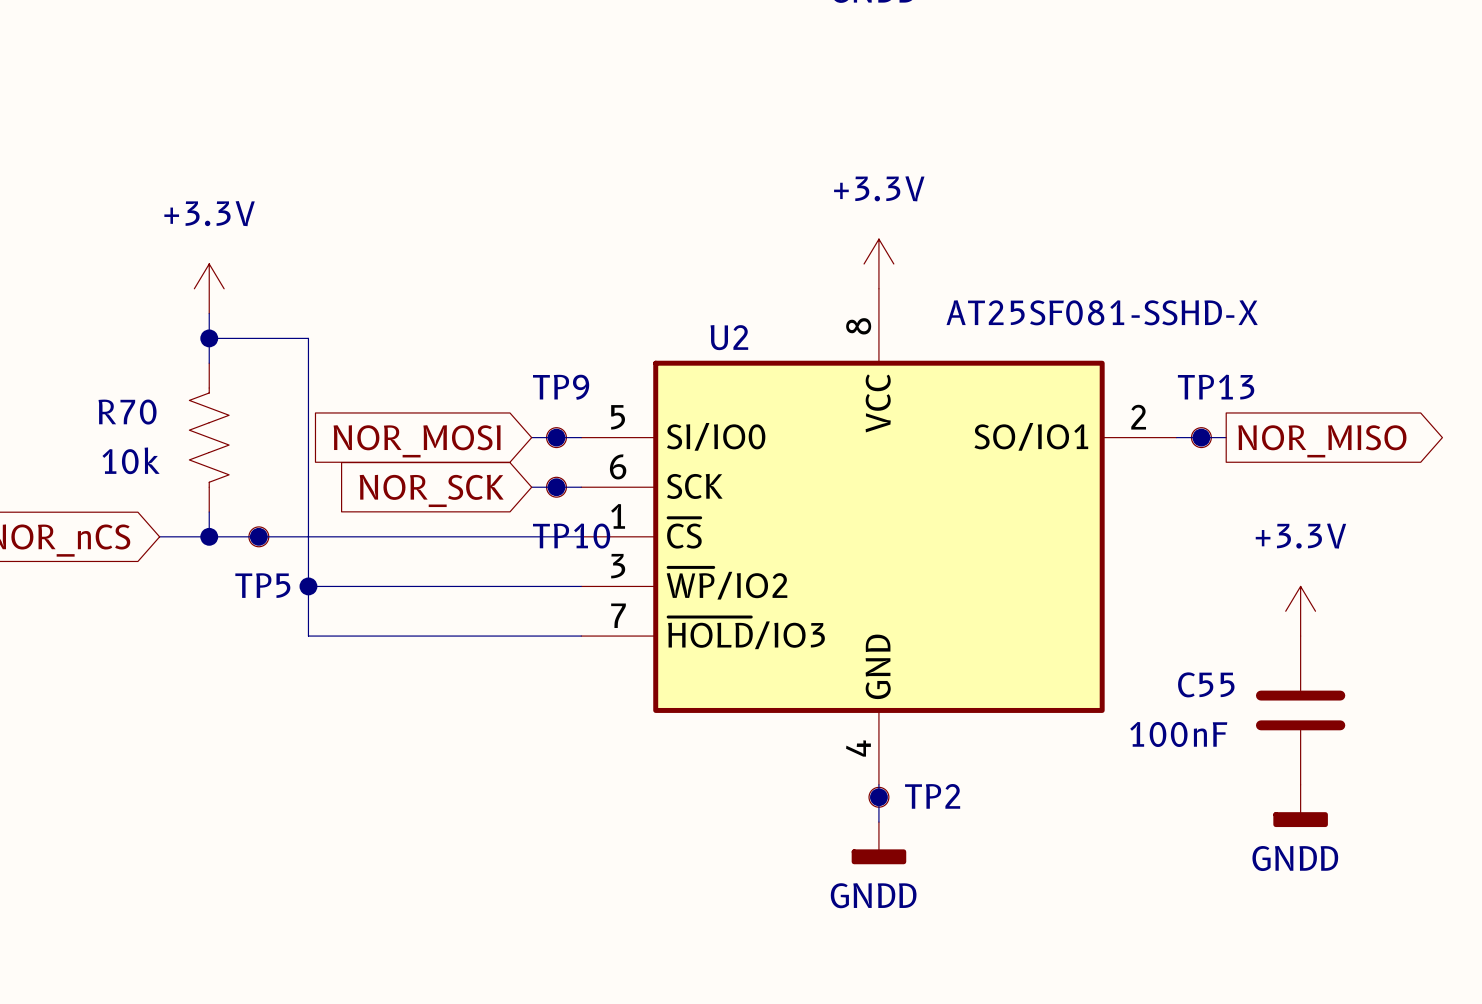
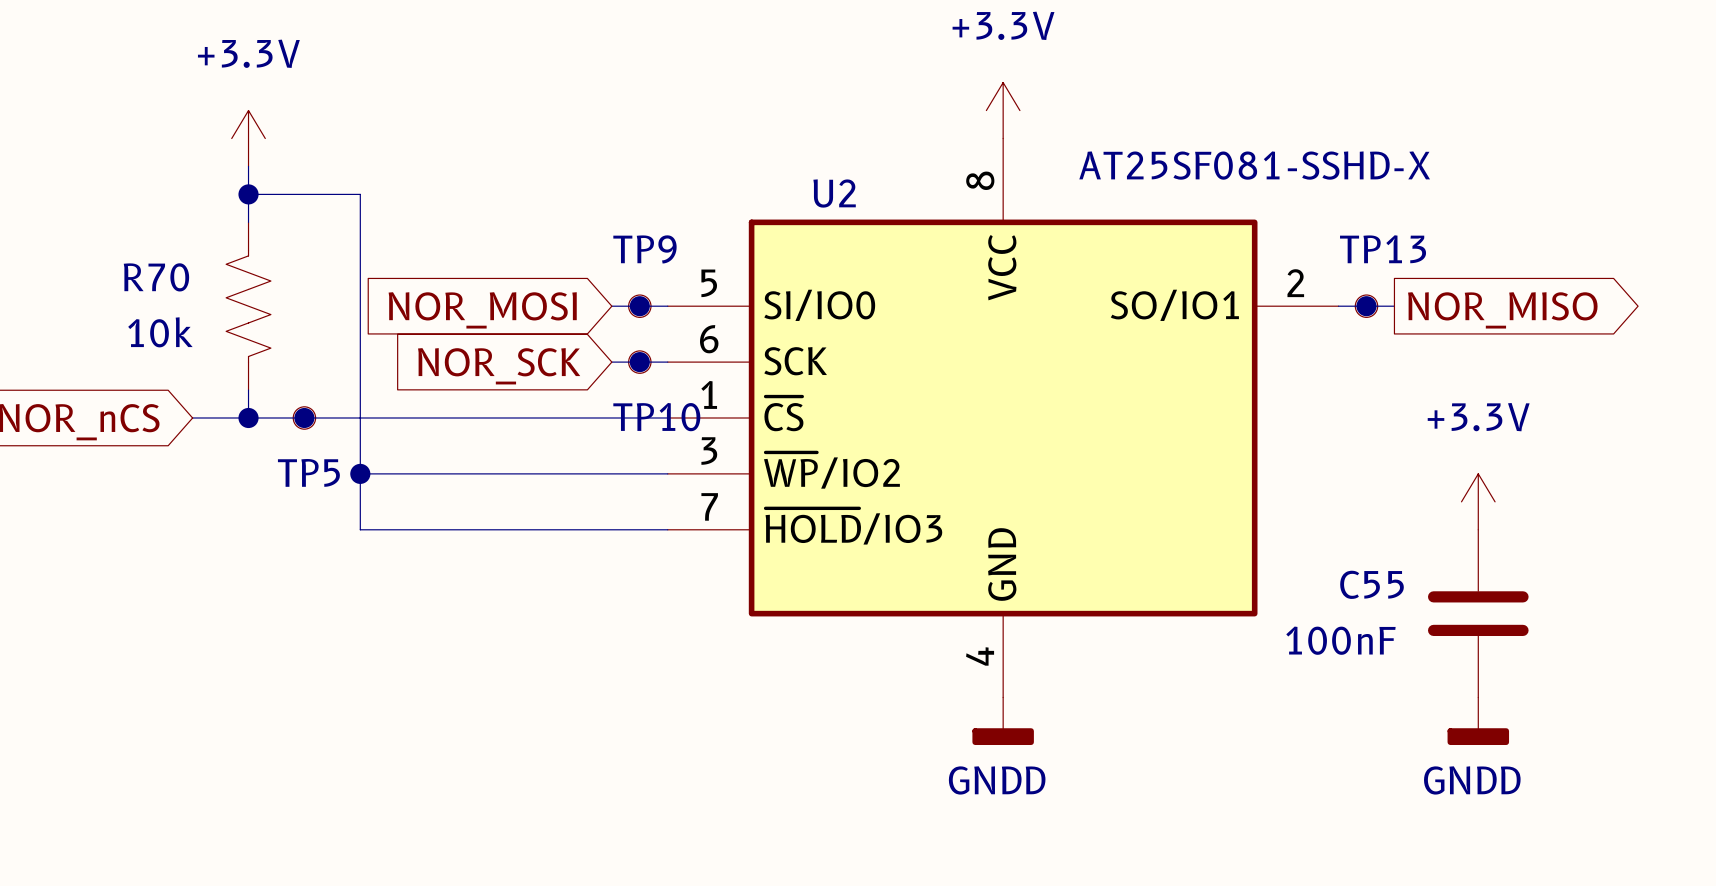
junction: (878, 797) -> none
TP2: (878, 797) -> none
power symbol position: GNDD (878, 843) -> GNDD (1003, 721)

